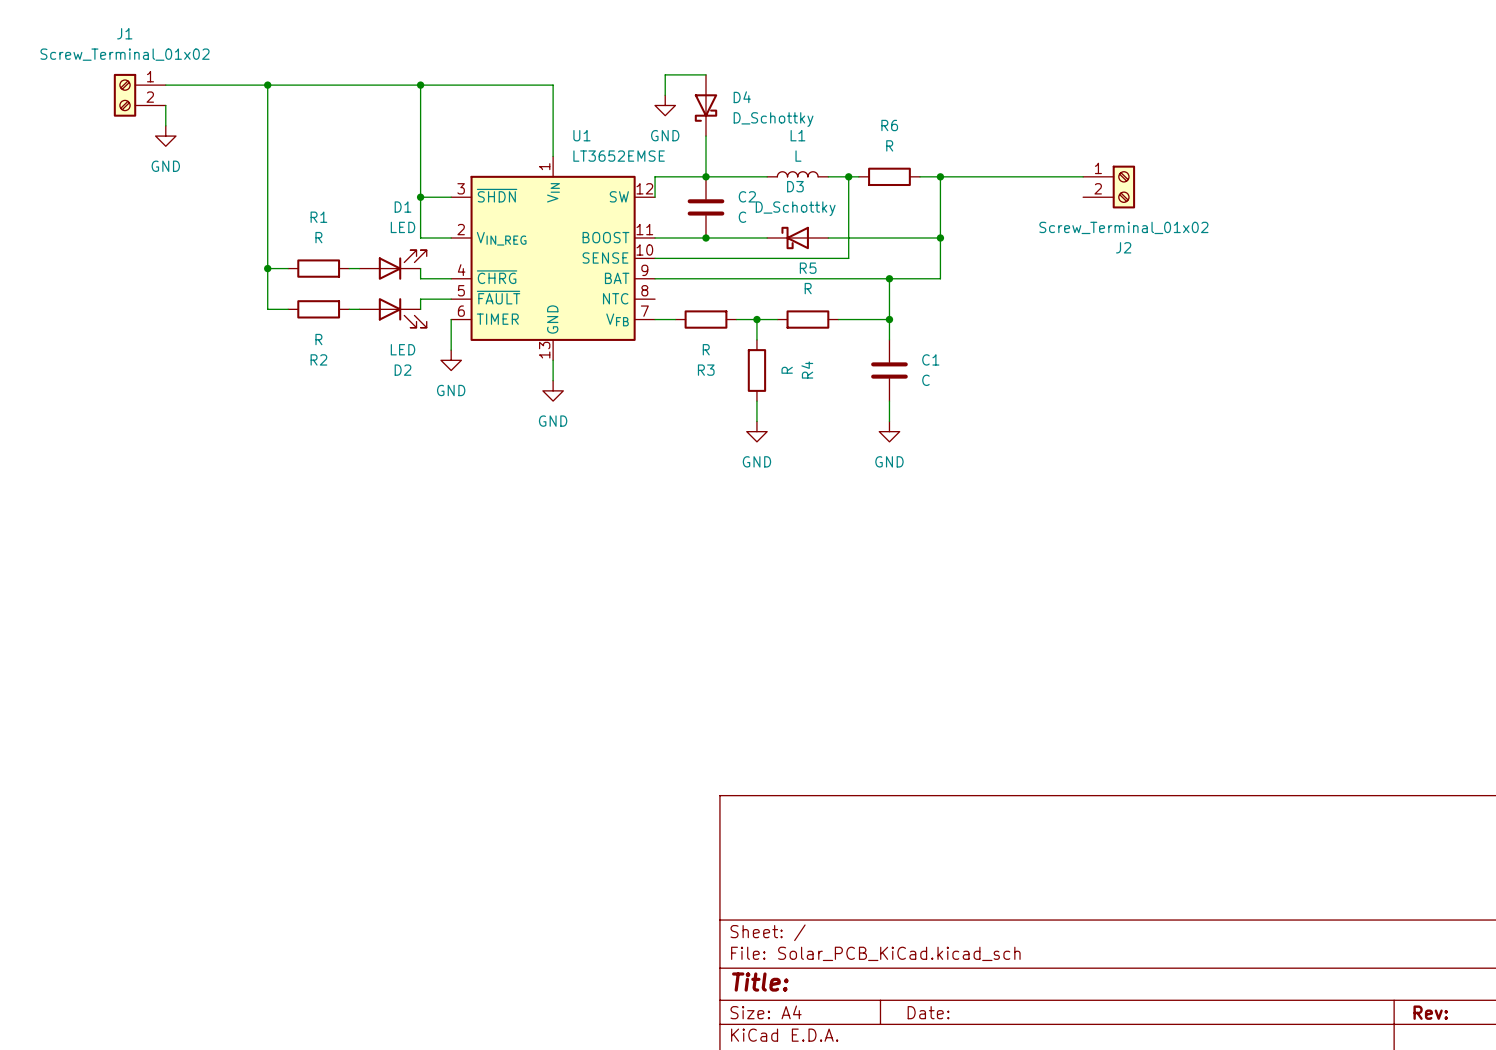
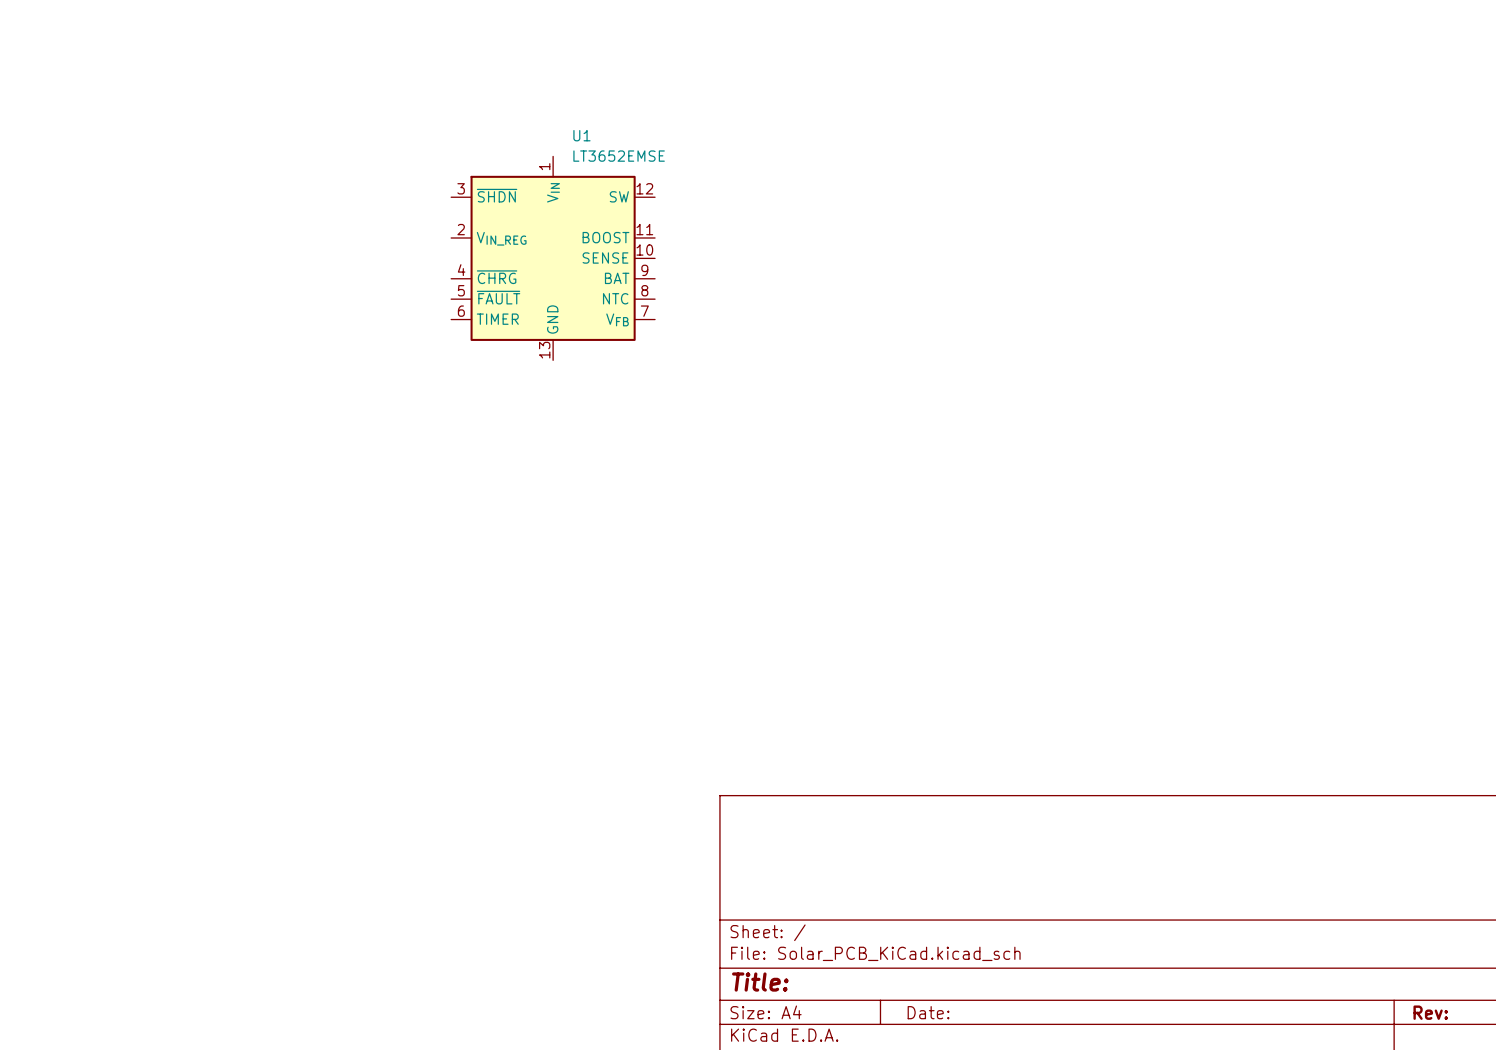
wire: (706, 74) (665, 74) (665, 95) -> none
wire: (165, 85) (553, 85) (553, 156) -> none
wire: (267, 85) (267, 309) (288, 309) -> none
junction: (267, 85) -> none
wire: (420, 85) (420, 238) (451, 238) -> none
junction: (420, 85) -> none
J1: Screw_Terminal_01x02 (139, 95) -> none
wire: (165, 105) (165, 125) -> none
power symbol: GND (665, 105) -> none
D4: D_Schottky (706, 105) -> none
power symbol: GND (165, 136) -> none
wire: (706, 136) (706, 176) -> none
L1: L (797, 174) -> none
junction: (706, 176) -> none
wire: (767, 176) (655, 176) (655, 197) -> none
wire: (828, 176) (858, 176) -> none
wire: (848, 176) (848, 258) (655, 258) -> none
junction: (848, 176) -> none
R6: R (889, 176) -> none
wire: (920, 176) (1083, 176) -> none
wire: (940, 176) (940, 278) (655, 278) -> none
junction: (940, 176) -> none
J2: Screw_Terminal_01x02 (1109, 187) -> none
wire: (420, 197) (451, 197) -> none
junction: (420, 197) -> none
C2: C (706, 207) -> none
wire: (655, 238) (767, 238) -> none
junction: (706, 238) -> none
D3: D_Schottky (797, 238) -> none
wire: (828, 238) (940, 238) -> none
junction: (940, 238) -> none
D1: LED (393, 265) -> none
wire: (267, 268) (288, 268) -> none
junction: (267, 268) -> none
R1: R (318, 268) -> none
wire: (349, 268) (359, 268) -> none
wire: (420, 268) (420, 278) (451, 278) -> none
wire: (889, 278) (889, 339) -> none
junction: (889, 278) -> none
wire: (451, 299) (420, 299) (420, 309) -> none
R2: R (318, 309) -> none
wire: (349, 309) (359, 309) -> none
D2: LED (393, 312) -> none
wire: (451, 319) (451, 350) -> none
wire: (655, 319) (675, 319) -> none
R3: R (706, 319) -> none
wire: (736, 319) (777, 319) -> none
wire: (756, 319) (756, 339) -> none
junction: (756, 319) -> none
R5: R (807, 319) -> none
wire: (838, 319) (889, 319) -> none
junction: (889, 319) -> none
power symbol: GND (451, 360) -> none
wire: (553, 360) (553, 380) -> none
R4: R (756, 370) -> none
C1: C (889, 370) -> none
power symbol: GND (553, 390) -> none
wire: (756, 401) (756, 421) -> none
wire: (889, 401) (889, 421) -> none
power symbol: GND (756, 431) -> none
power symbol: GND (889, 431) -> none

